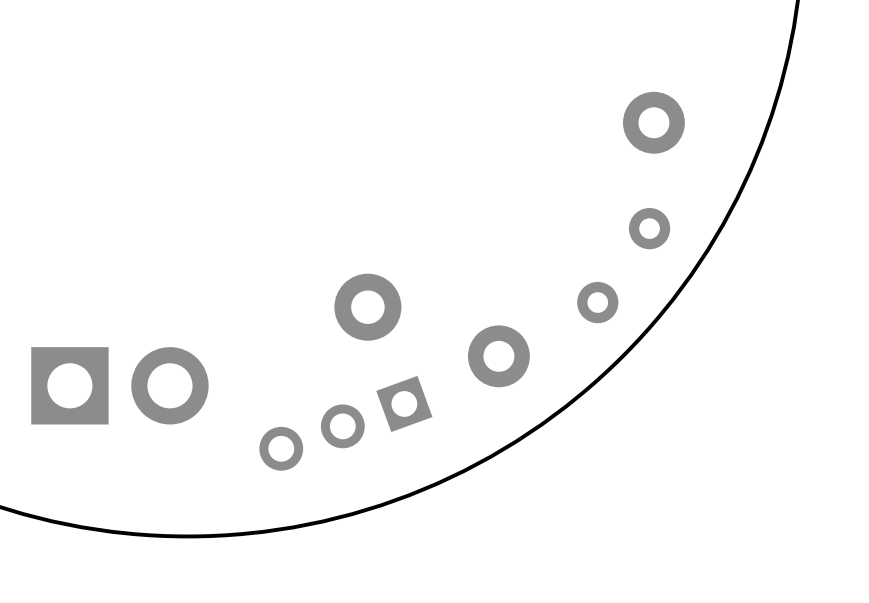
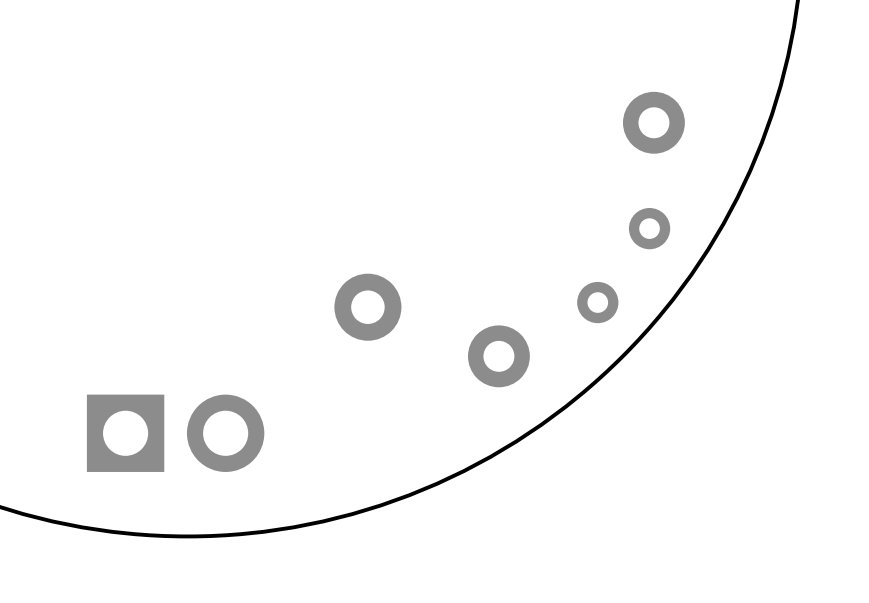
part position: (119, 385) -> (175, 433)
part: (345, 423) -> none

